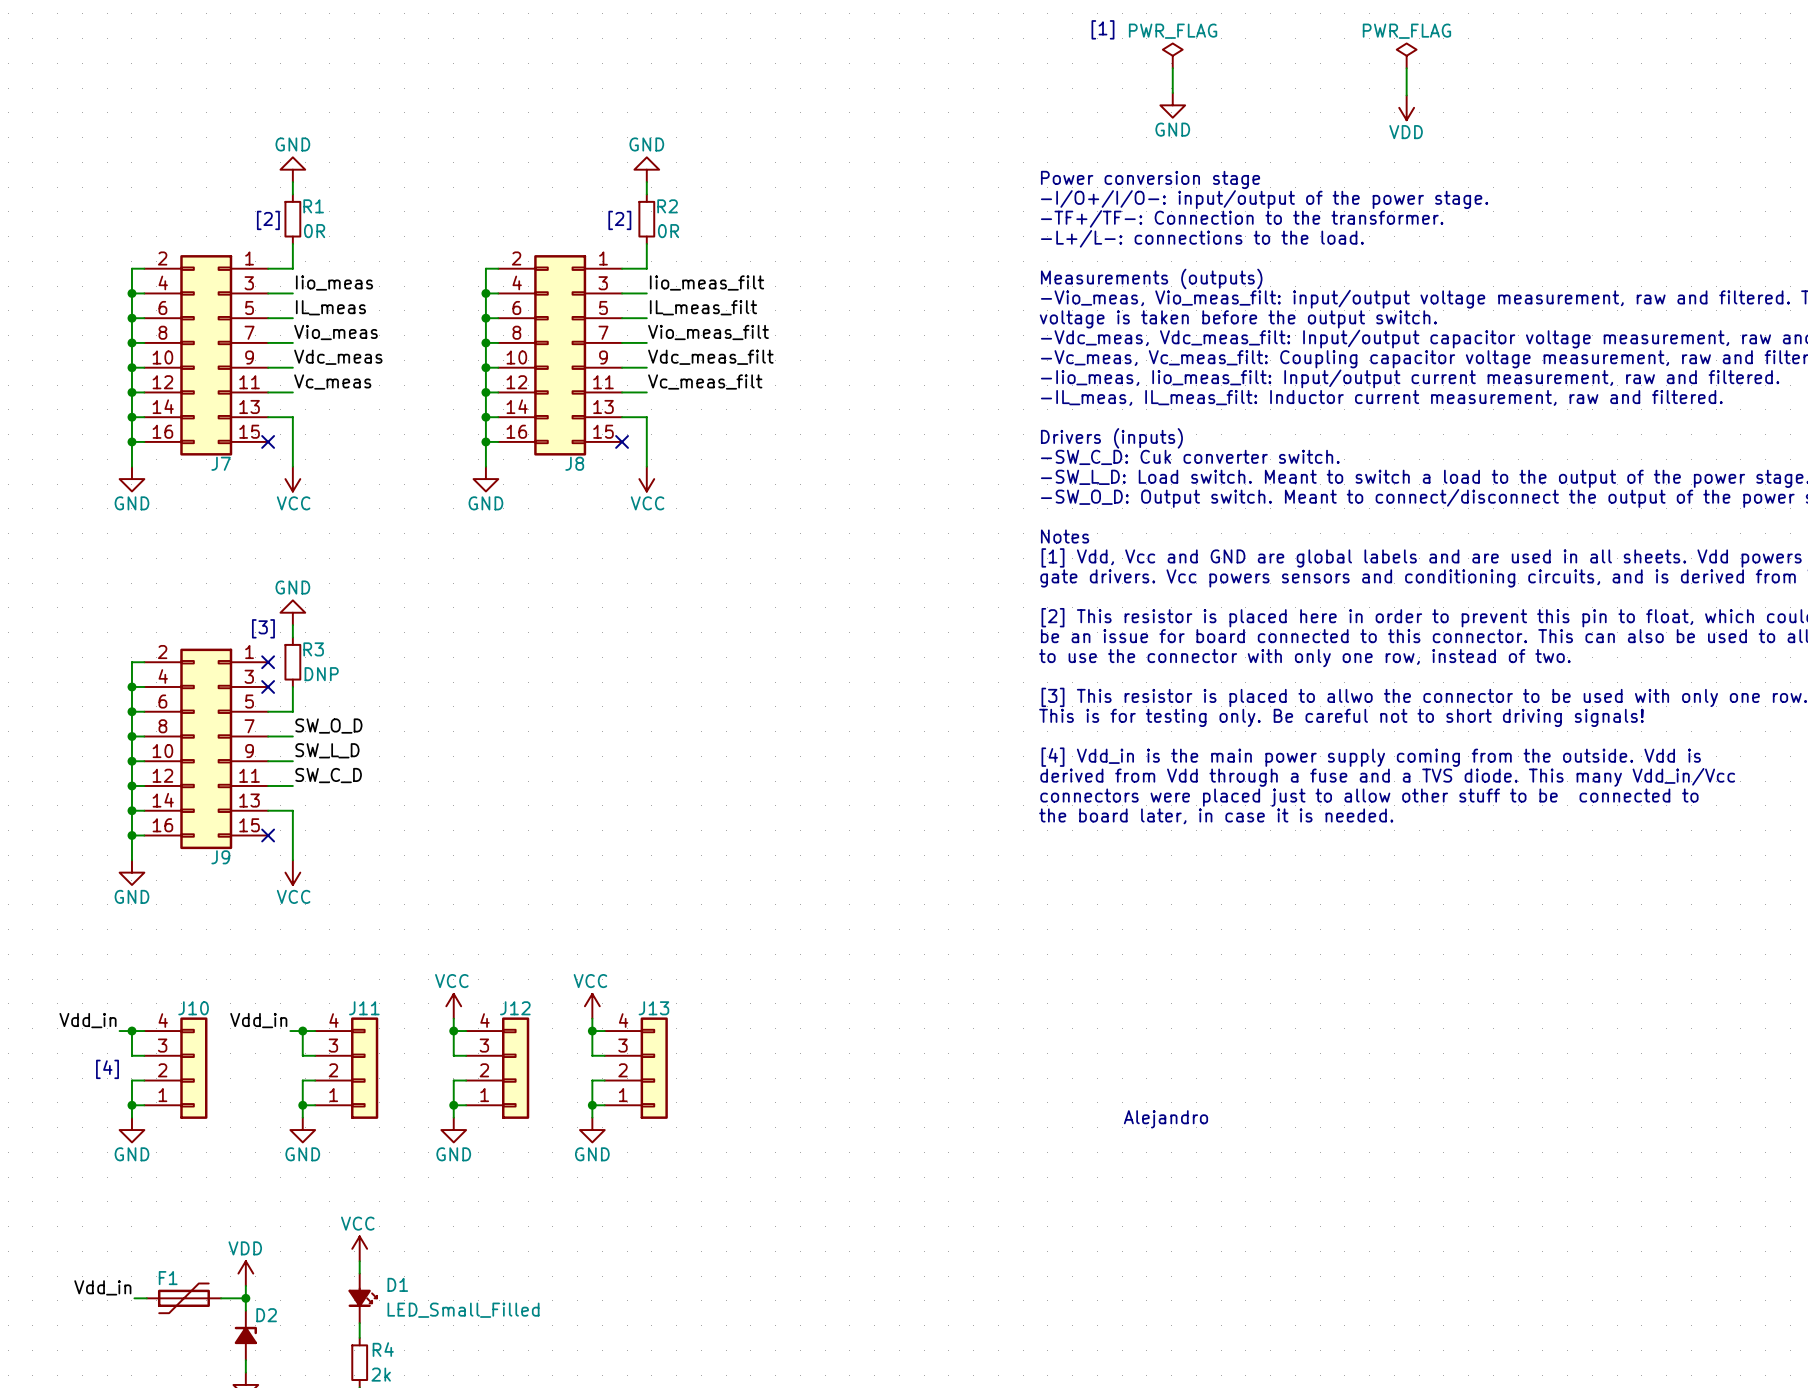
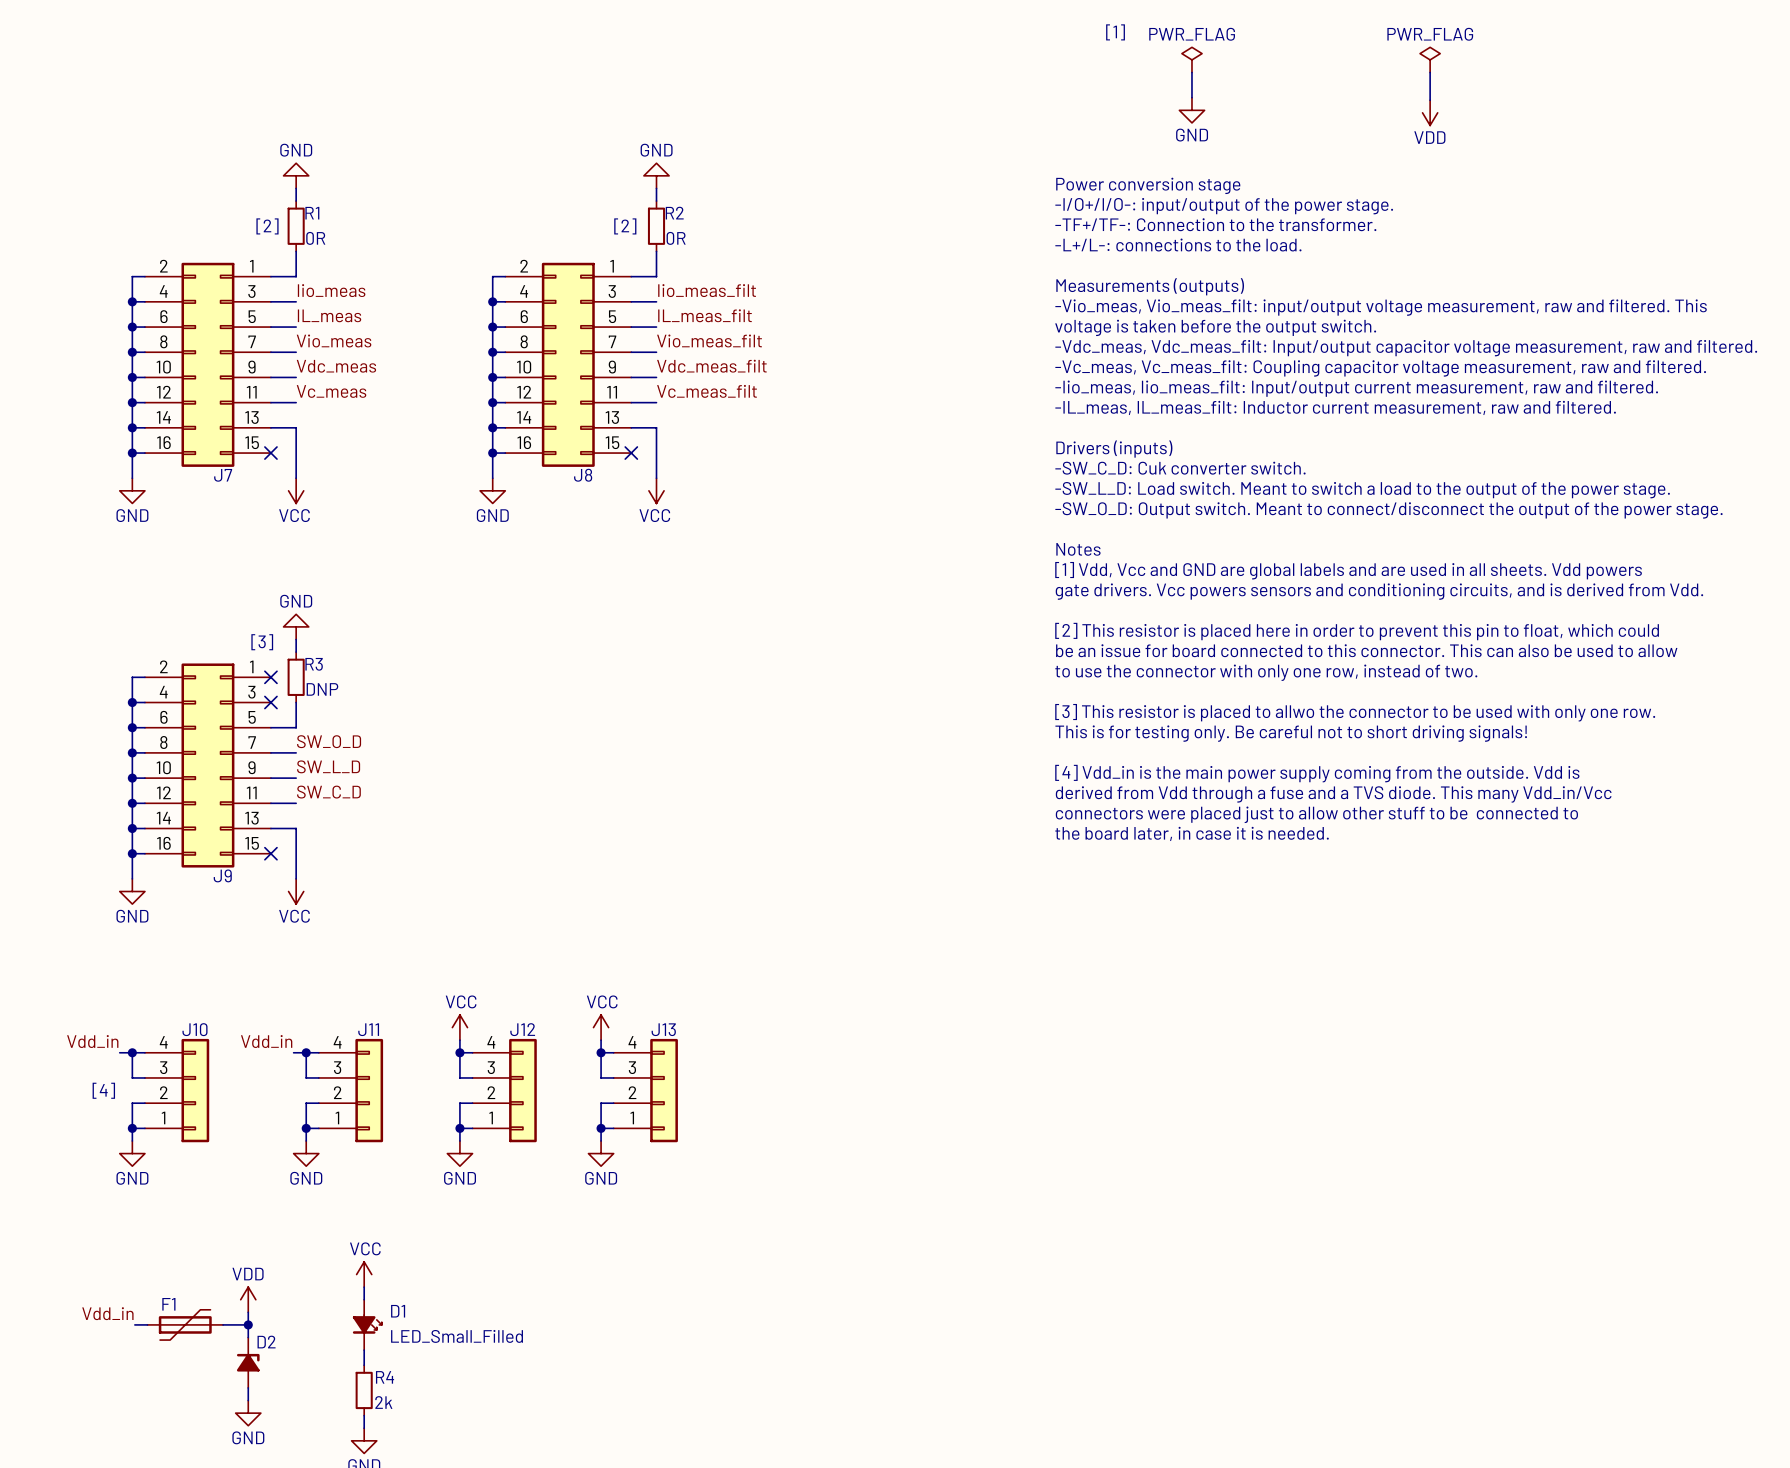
text: Alejandro (1165, 1119) -> none

